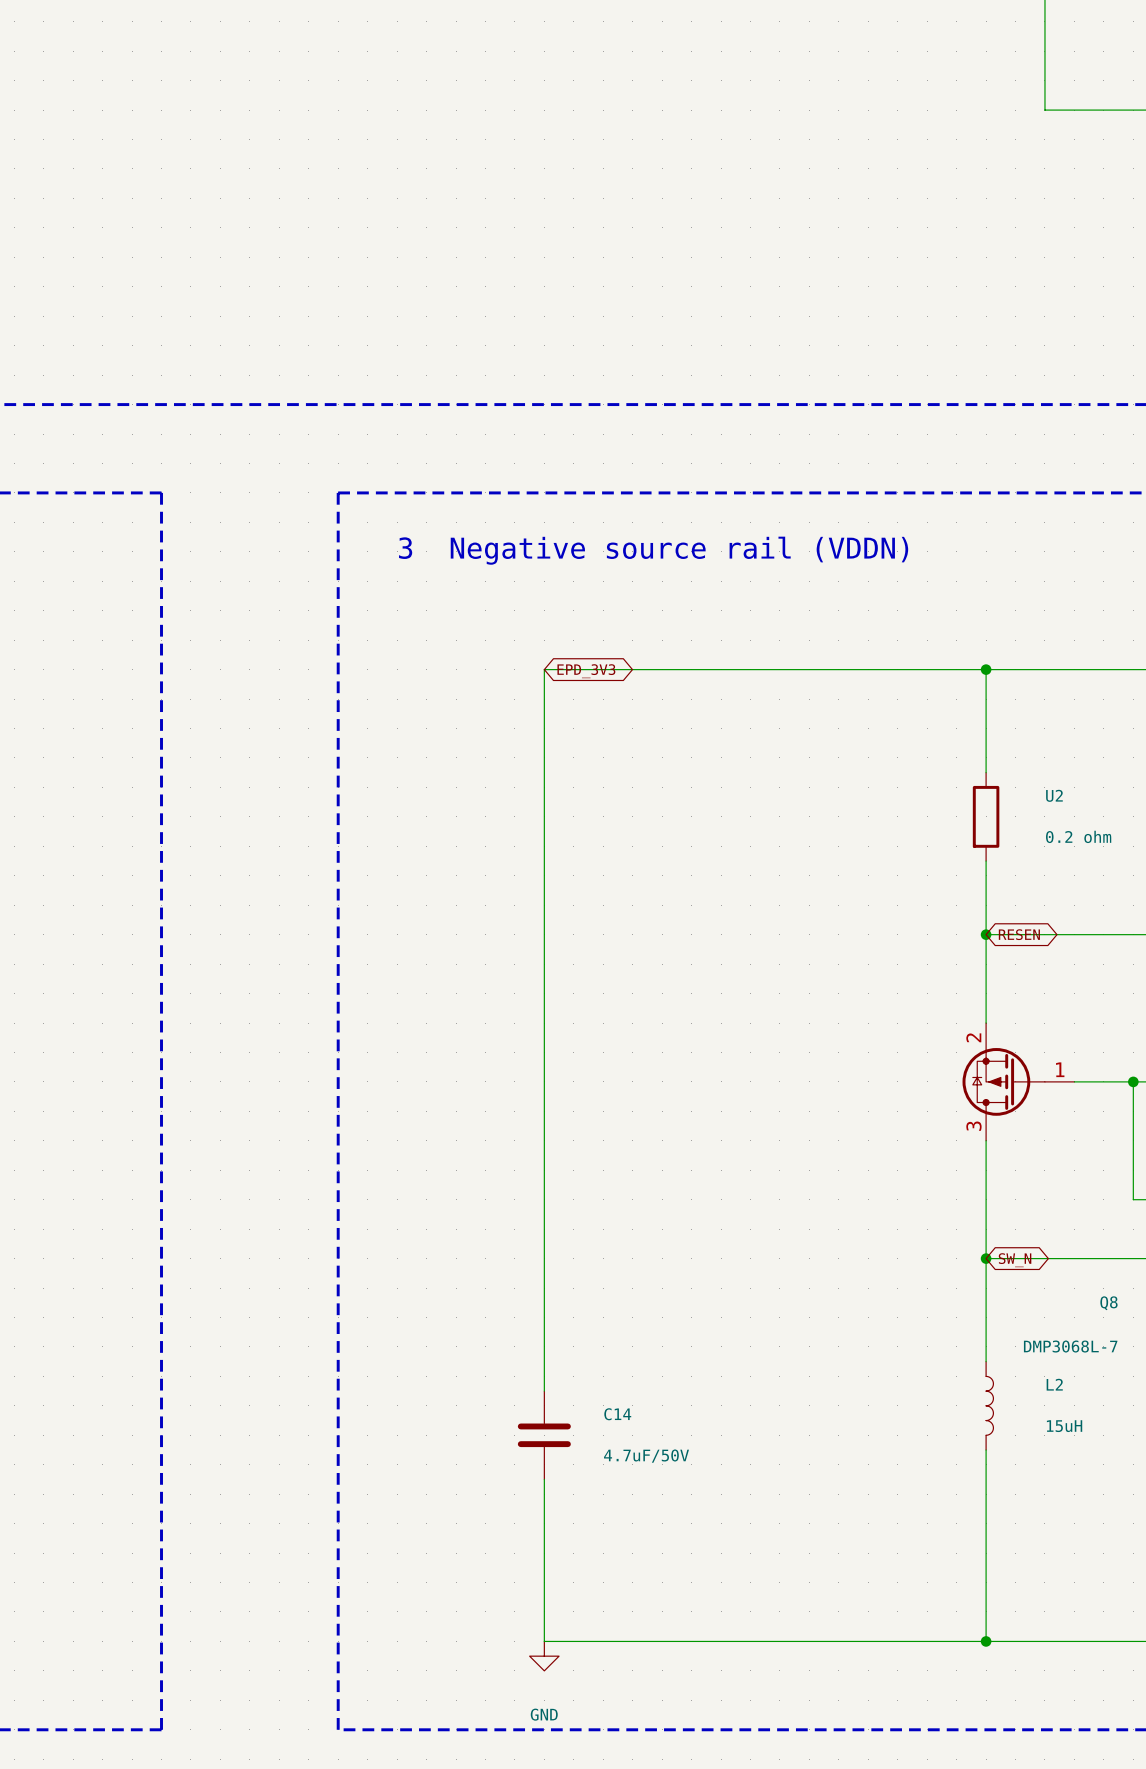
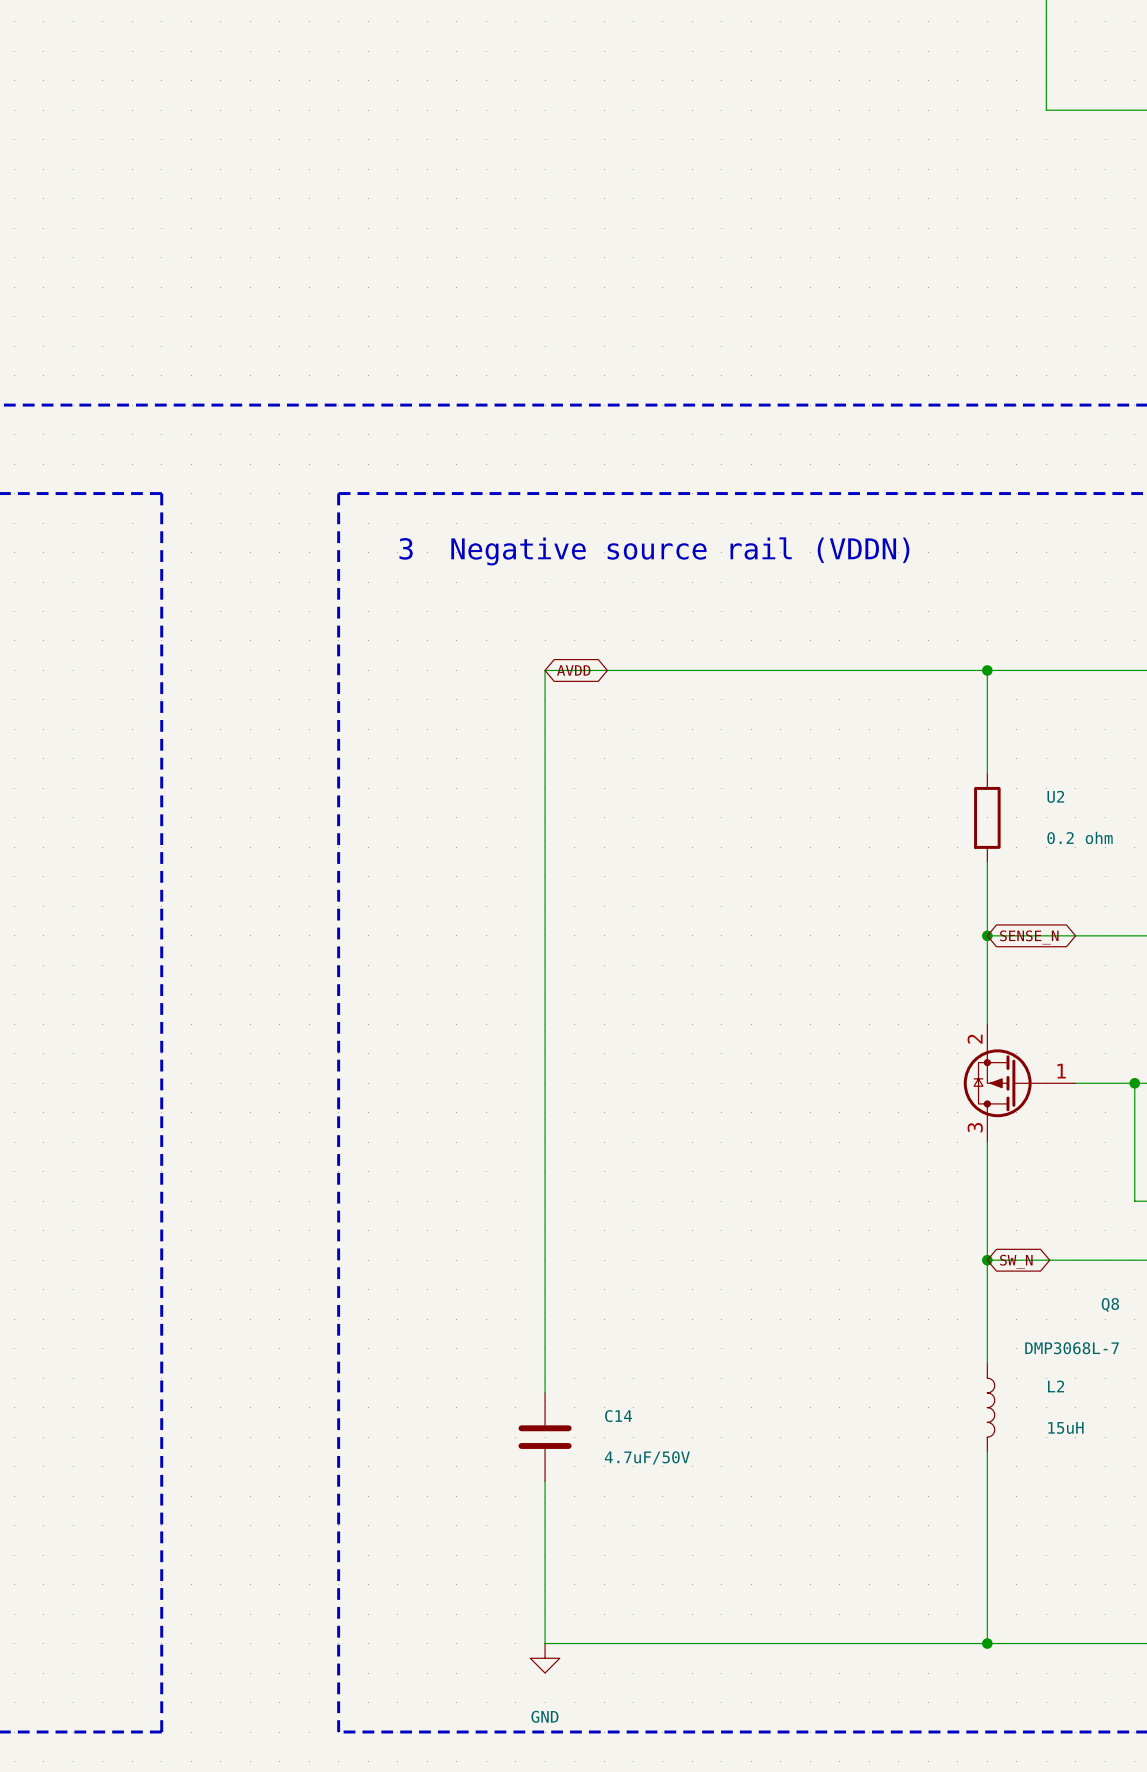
global label: EPD_3V3 (586, 671) -> AVDD (573, 670)
global label: RESEN (1019, 934) -> SENSE_N (1029, 937)

